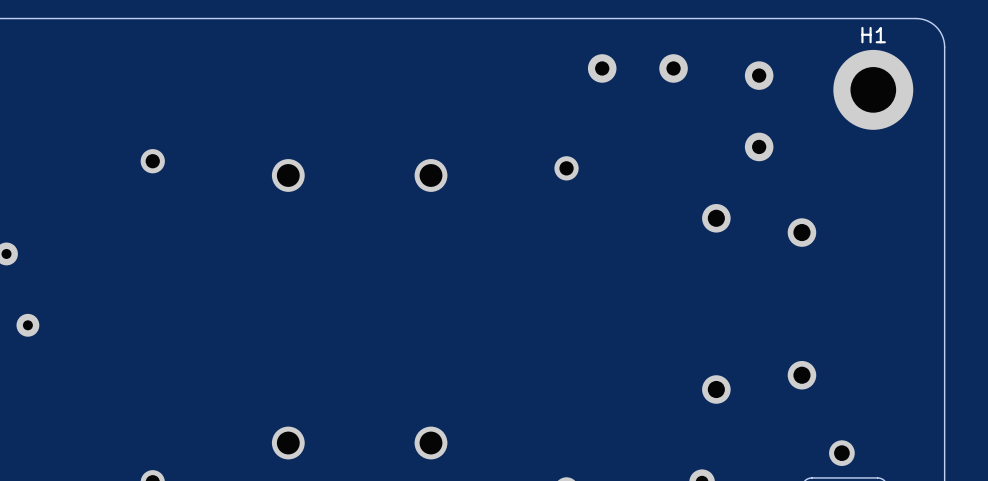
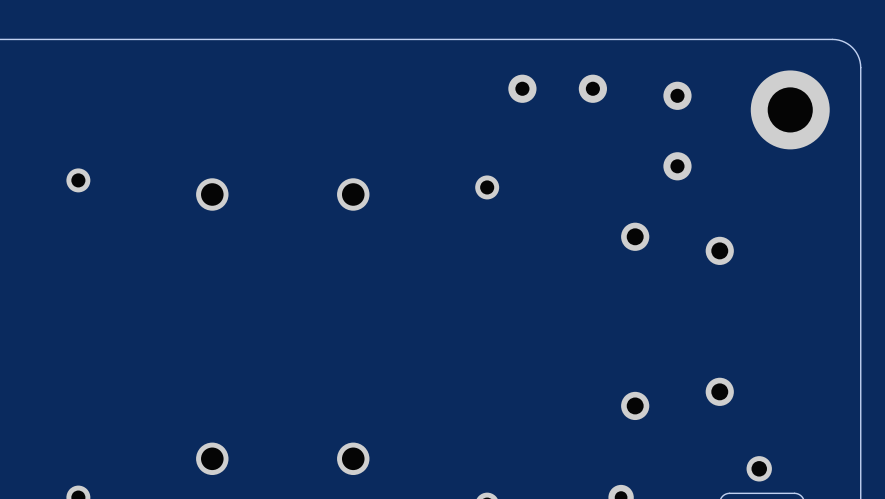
H1 name: H1 (873, 35) -> none

